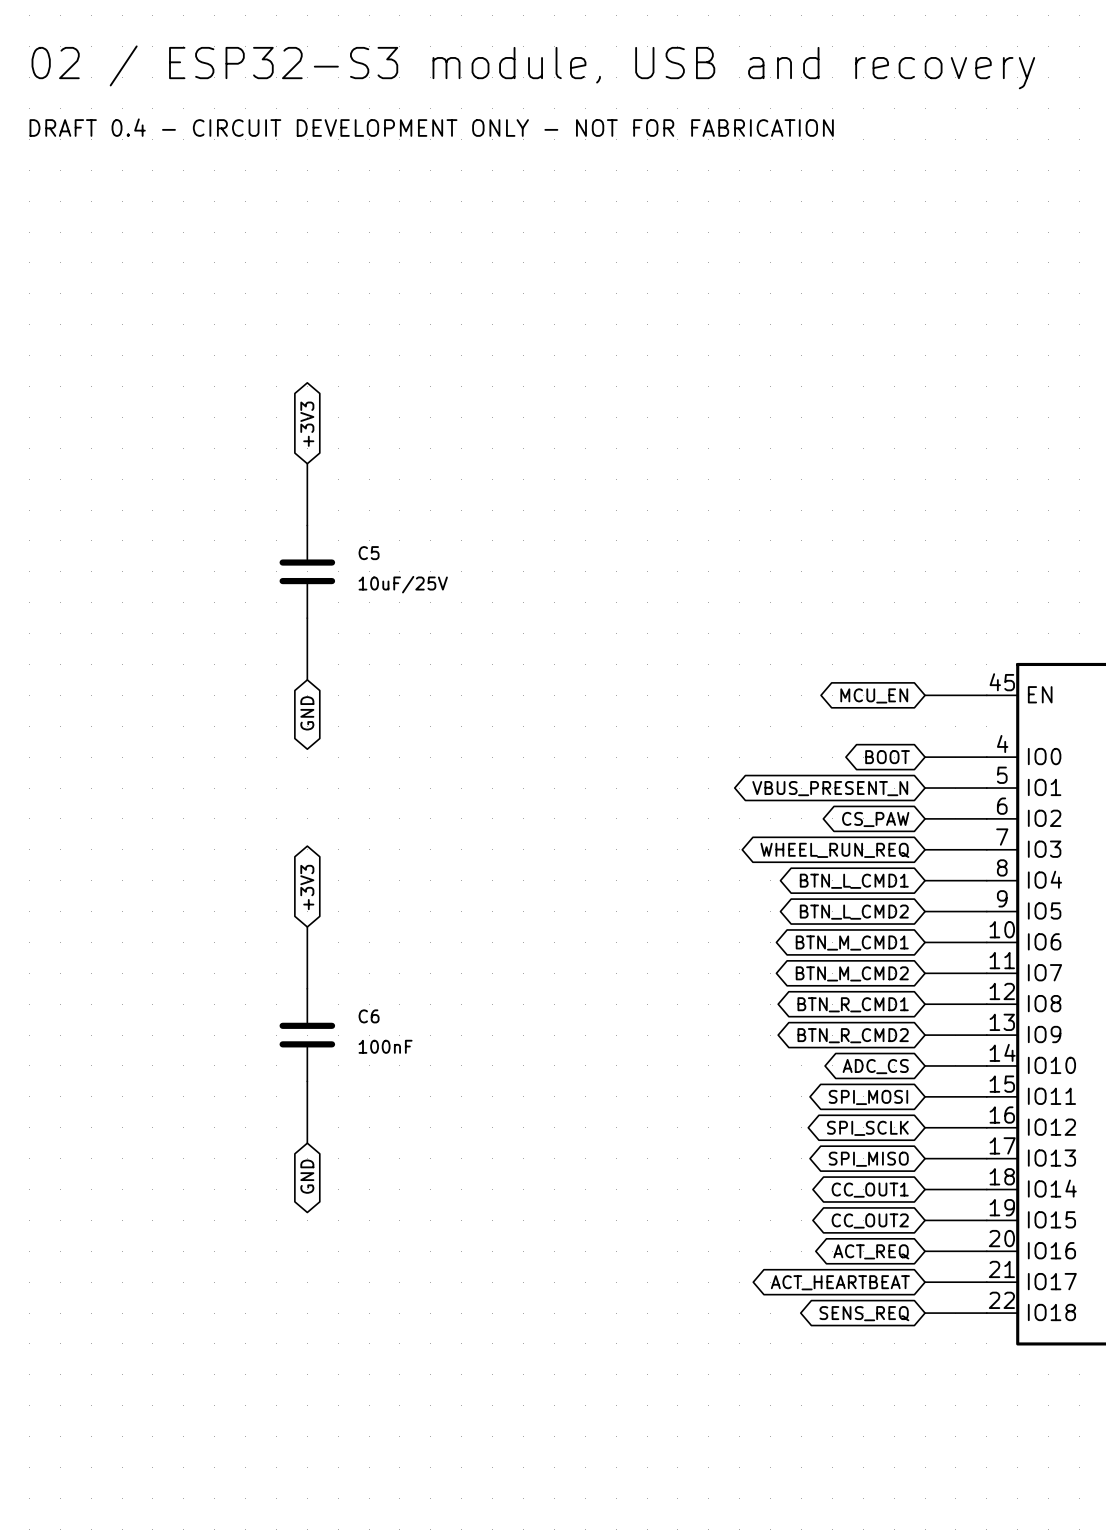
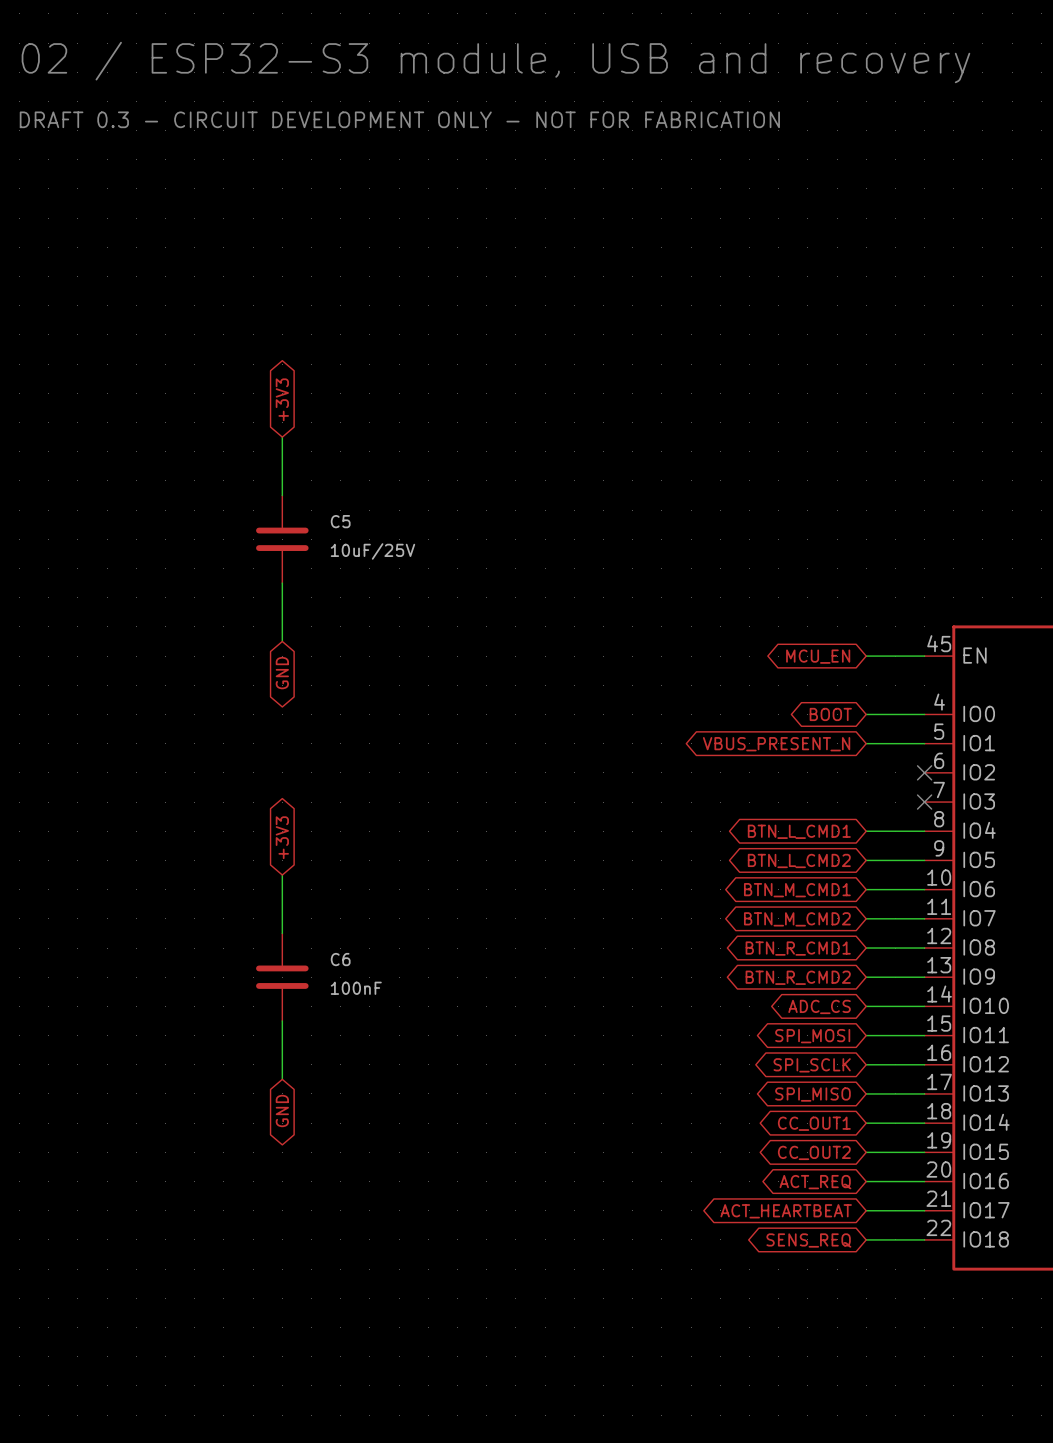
text: DRAFT 0.4 - CIRCUIT DEVELOPMENT ONLY - NOT FOR FABRICATION (431, 127) -> DRAFT 0.3 - CIRCUIT DEVELOPMENT ONLY - NOT FOR FABRICATION (399, 119)
wire: (925, 818) (986, 818) -> none
no-connect mark: none -> (924, 772)
global label: CS_PAW (875, 819) -> none
wire: (925, 849) (986, 849) -> none
no-connect mark: none -> (924, 802)
global label: WHEEL_RUN_REQ (834, 850) -> none

